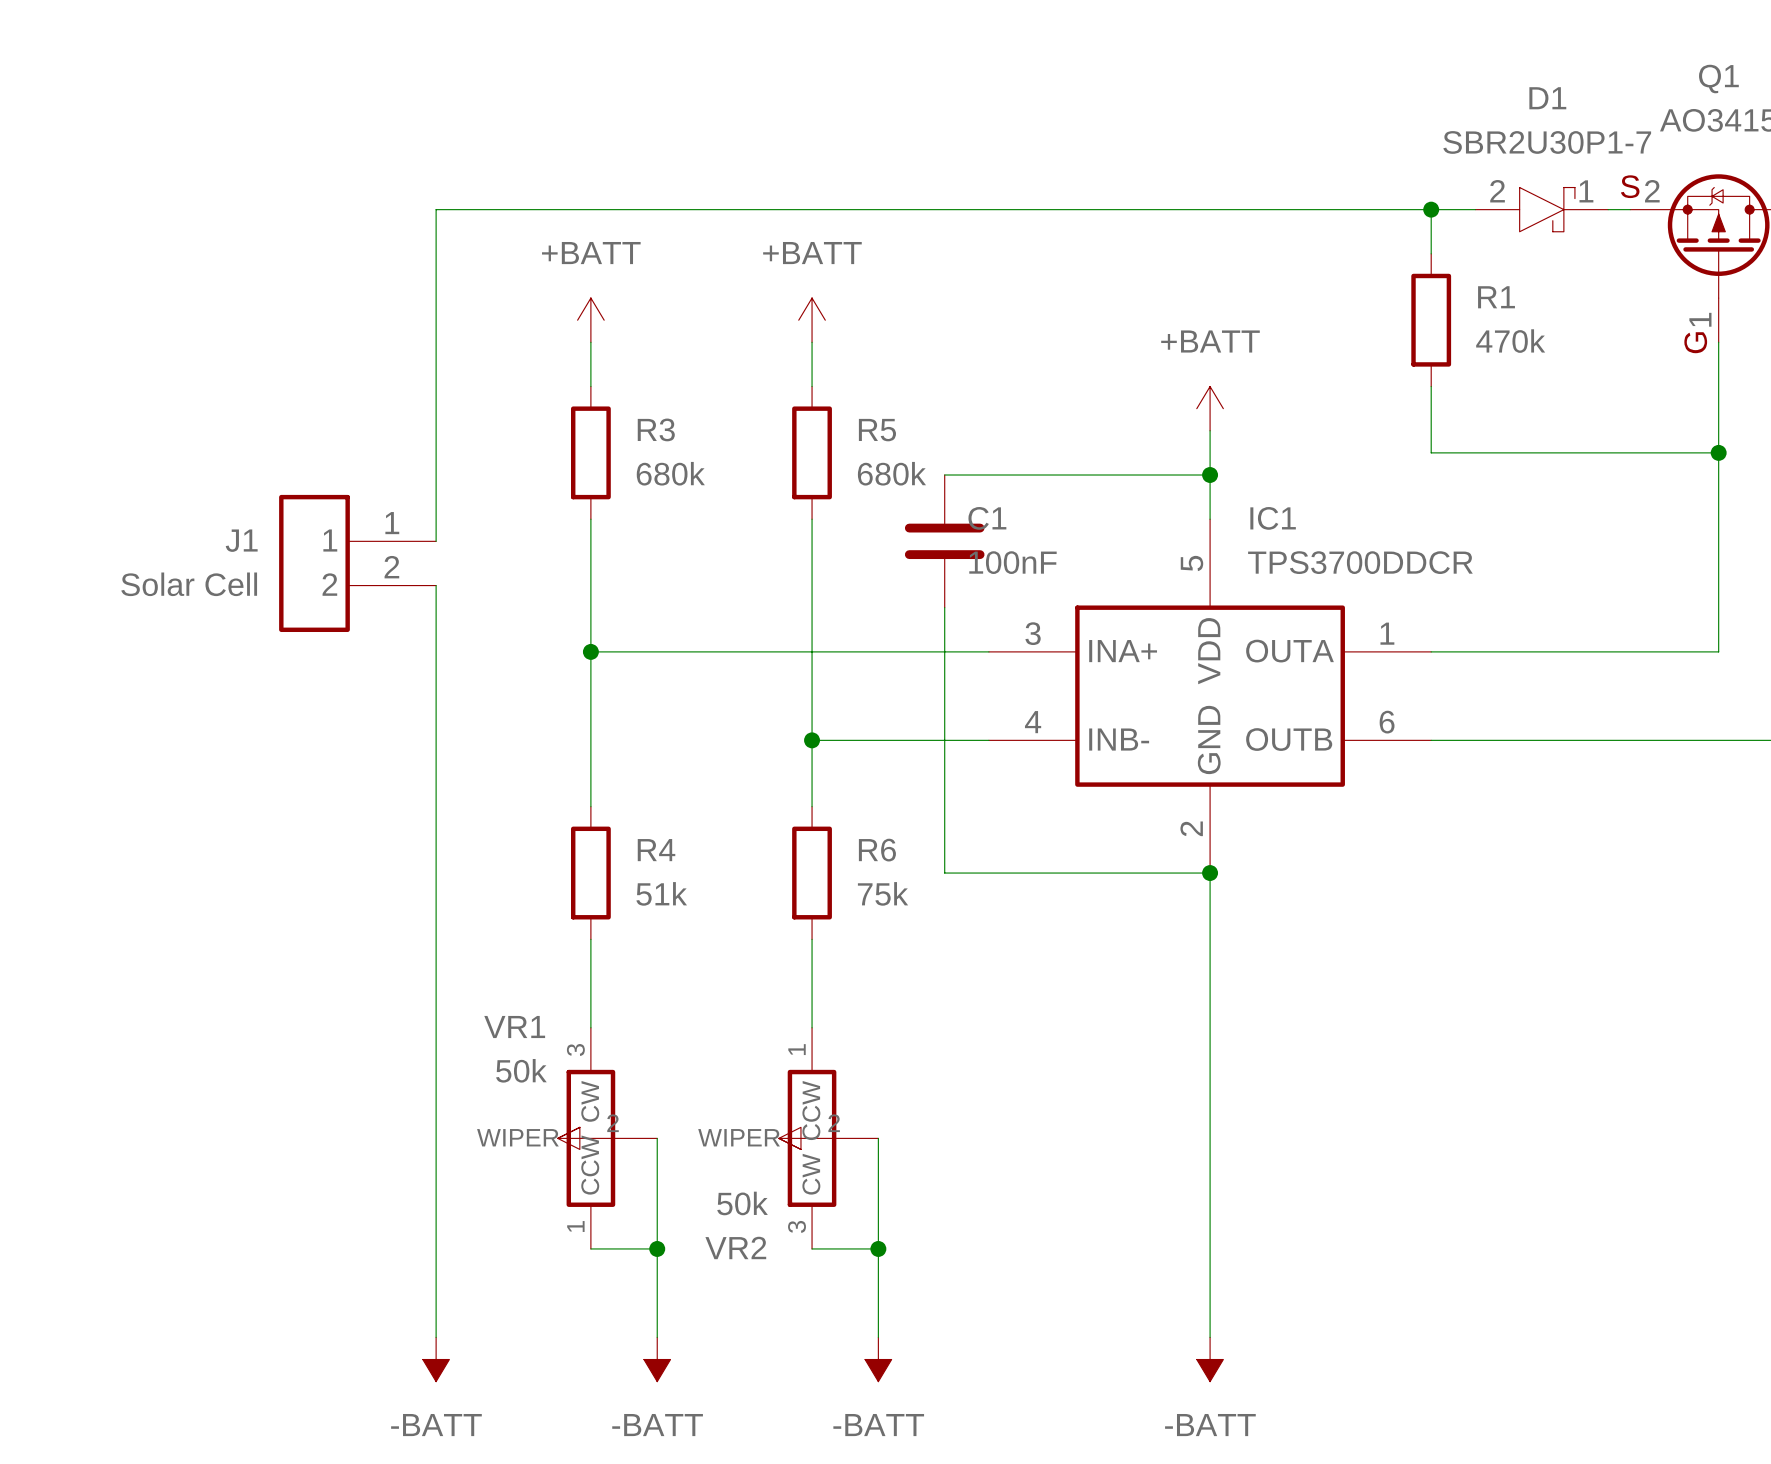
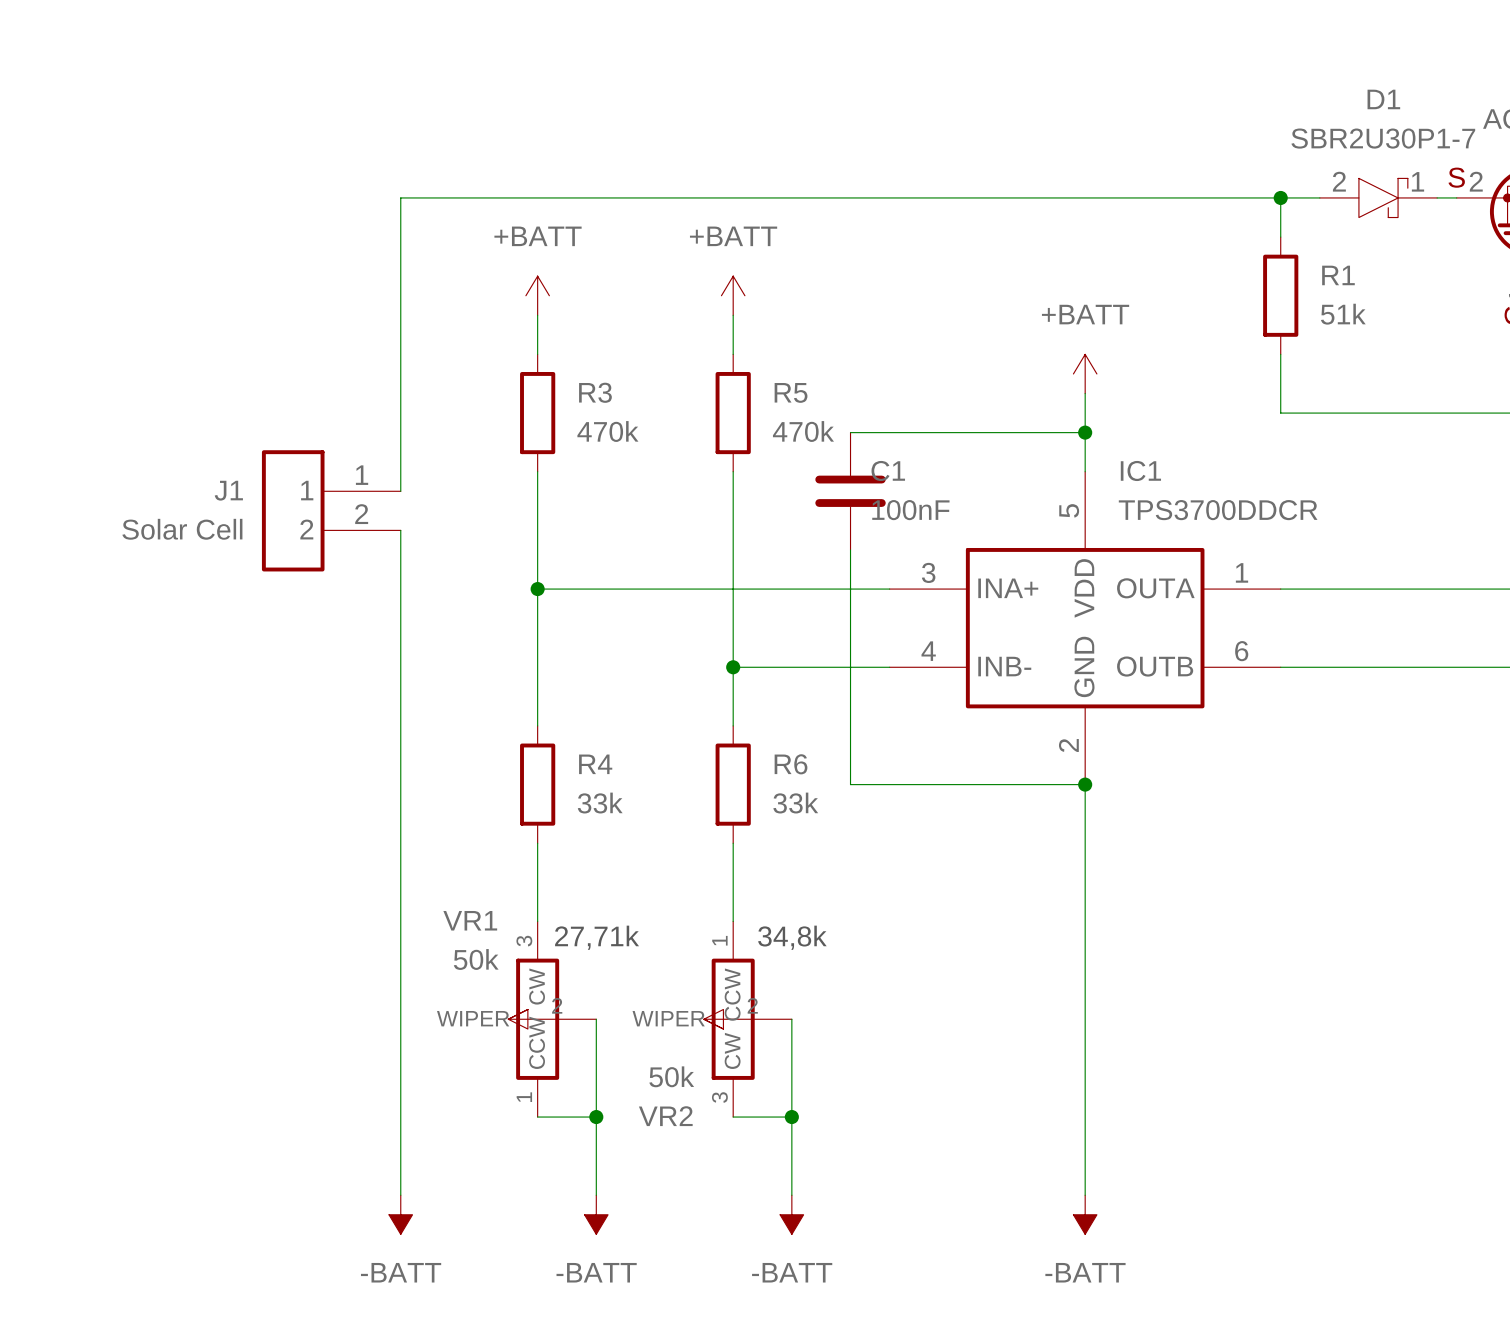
R1 value: 470k (1510, 341) -> 51k (1343, 314)
R3 value: 680k (670, 473) -> 470k (607, 431)
R5 value: 680k (891, 473) -> 470k (803, 431)
R4 value: 51k (661, 893) -> 33k (600, 803)
R6 value: 75k (883, 893) -> 33k (795, 803)
text: none -> 27,71k (597, 937)
text: none -> 34,8k (792, 937)

